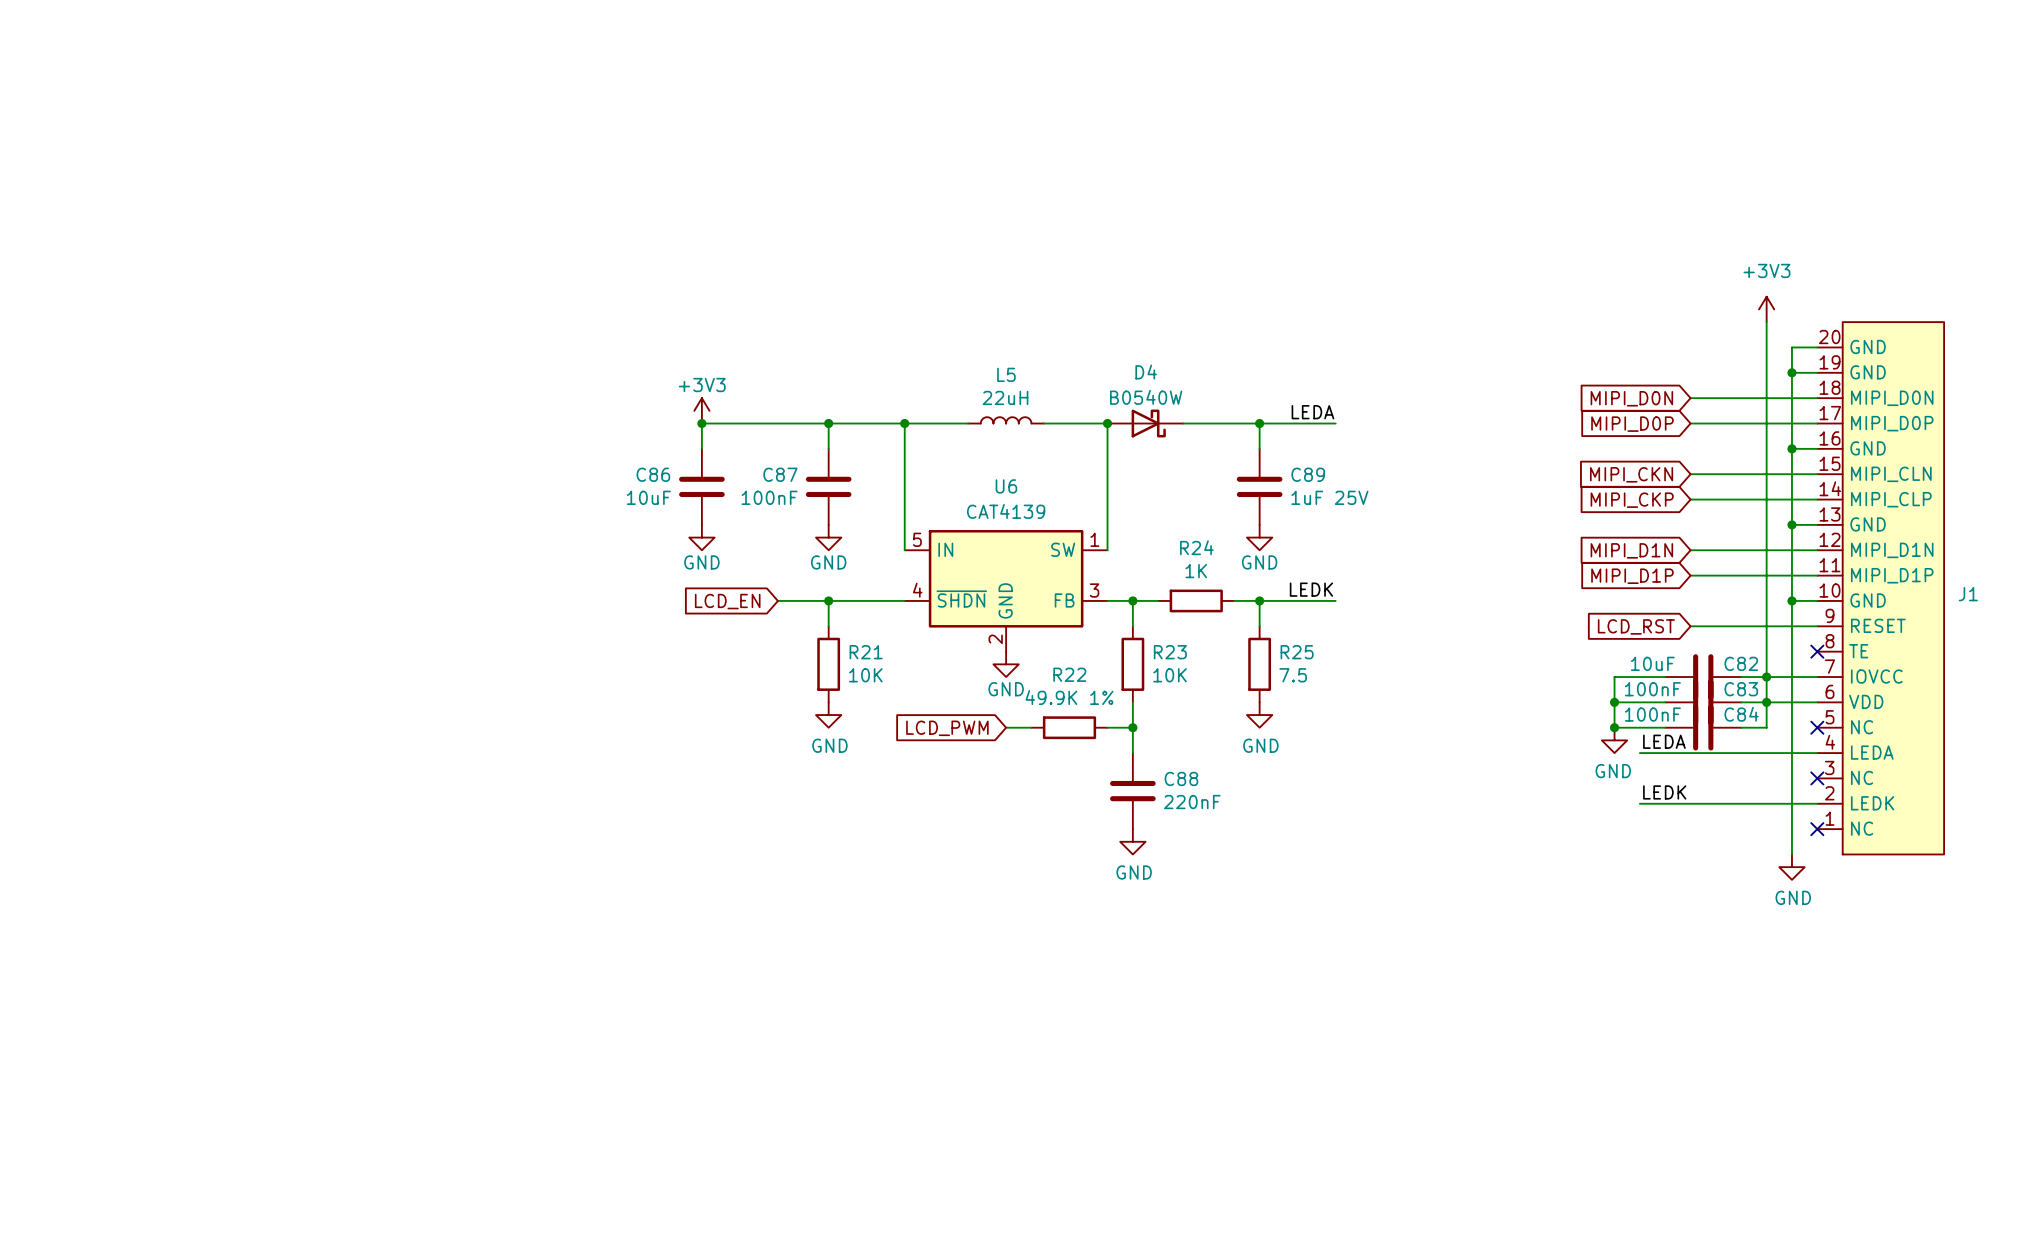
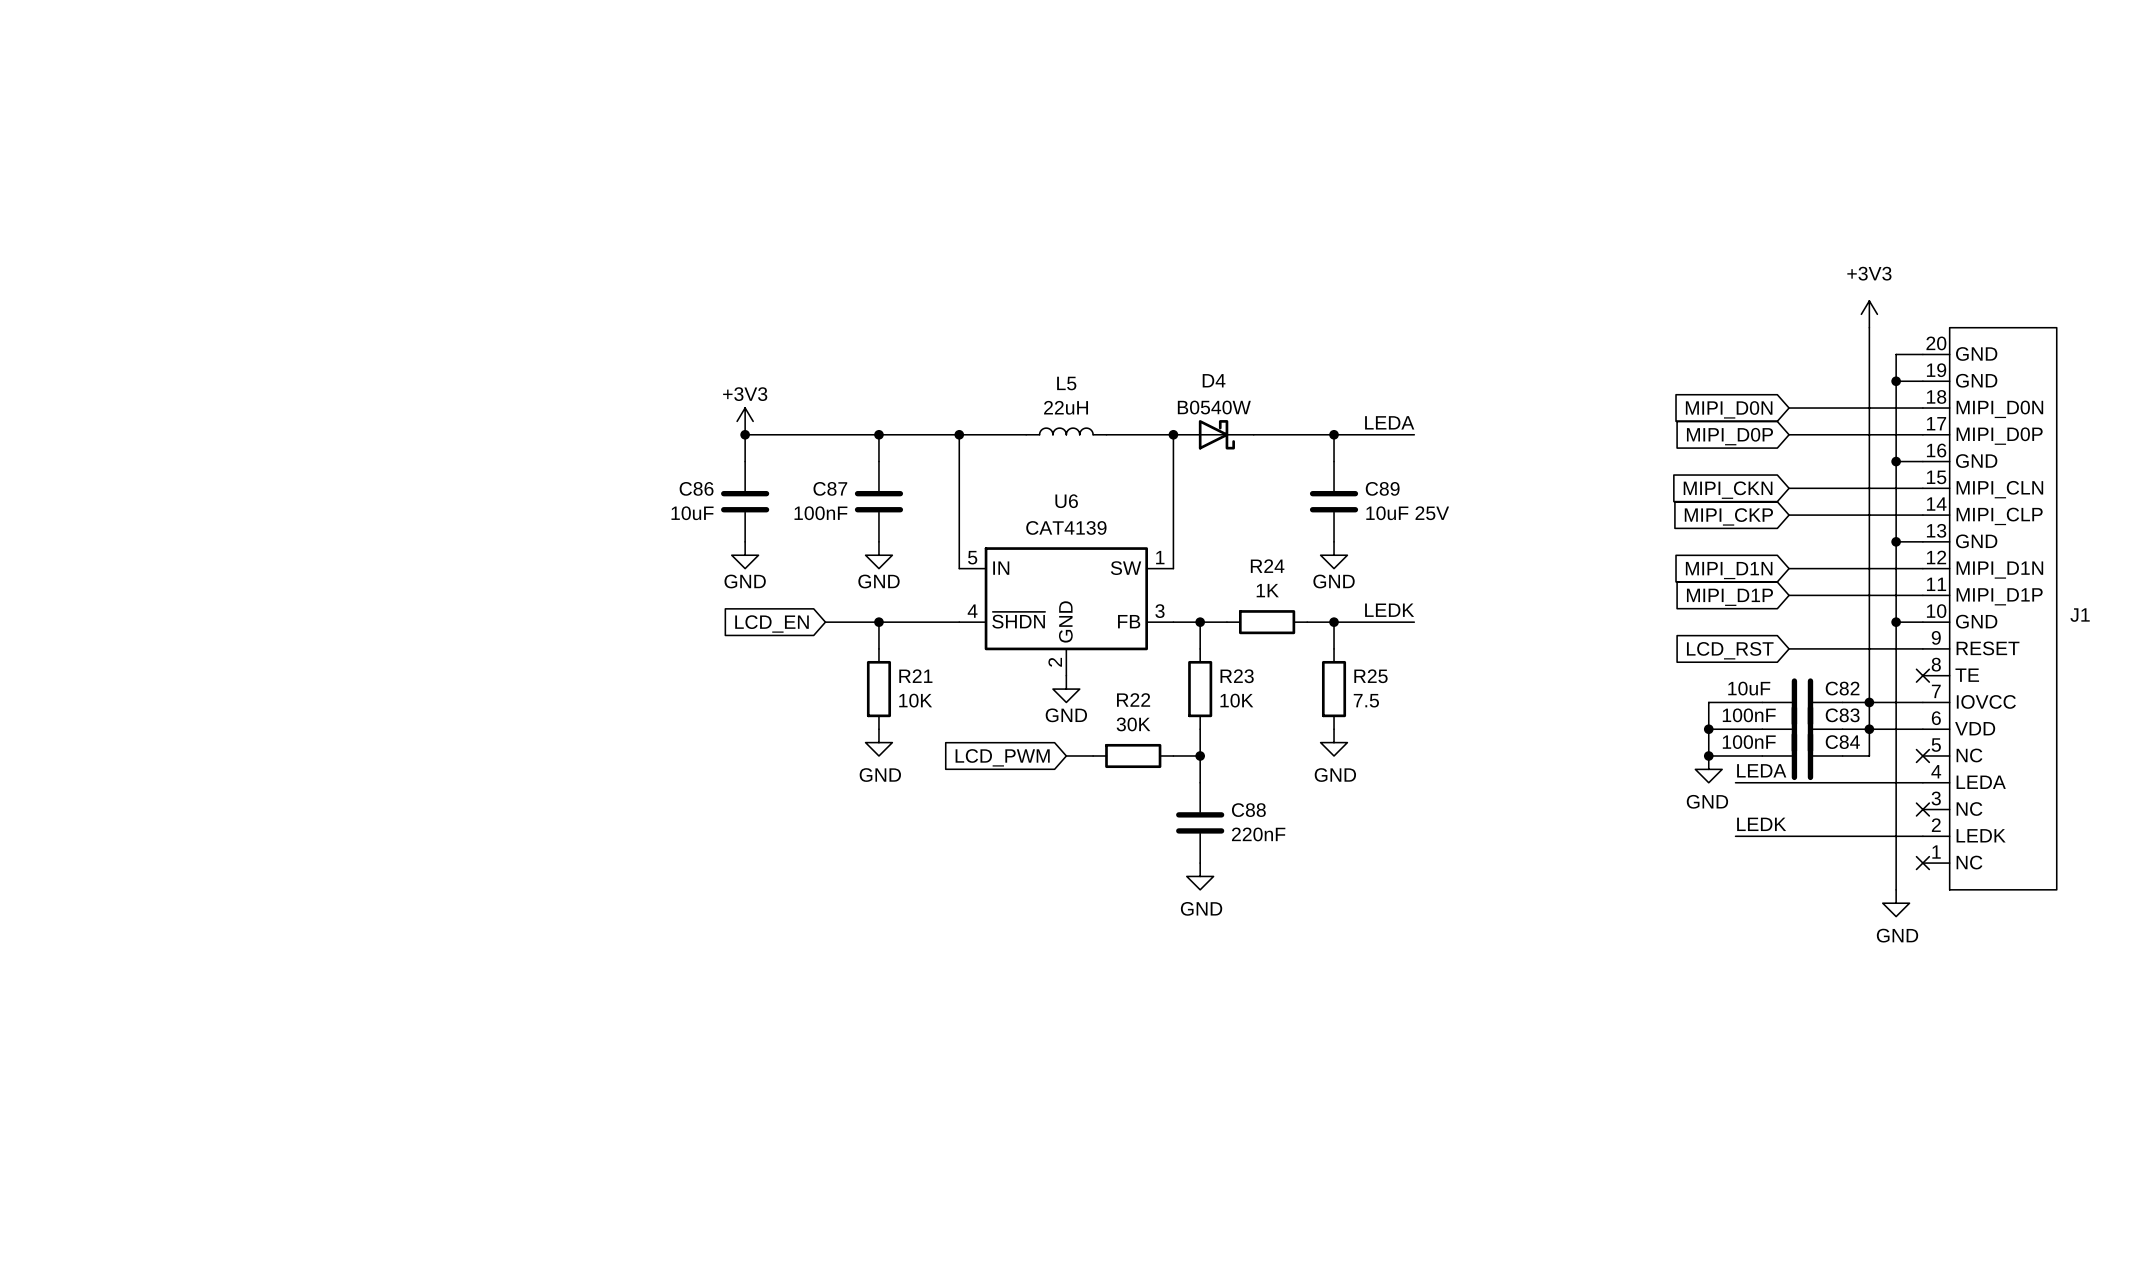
C89 value: 1uF 25V (1329, 497) -> 10uF 25V (1407, 513)
R22 value: 49.9K 1% (1069, 697) -> 30K (1133, 724)

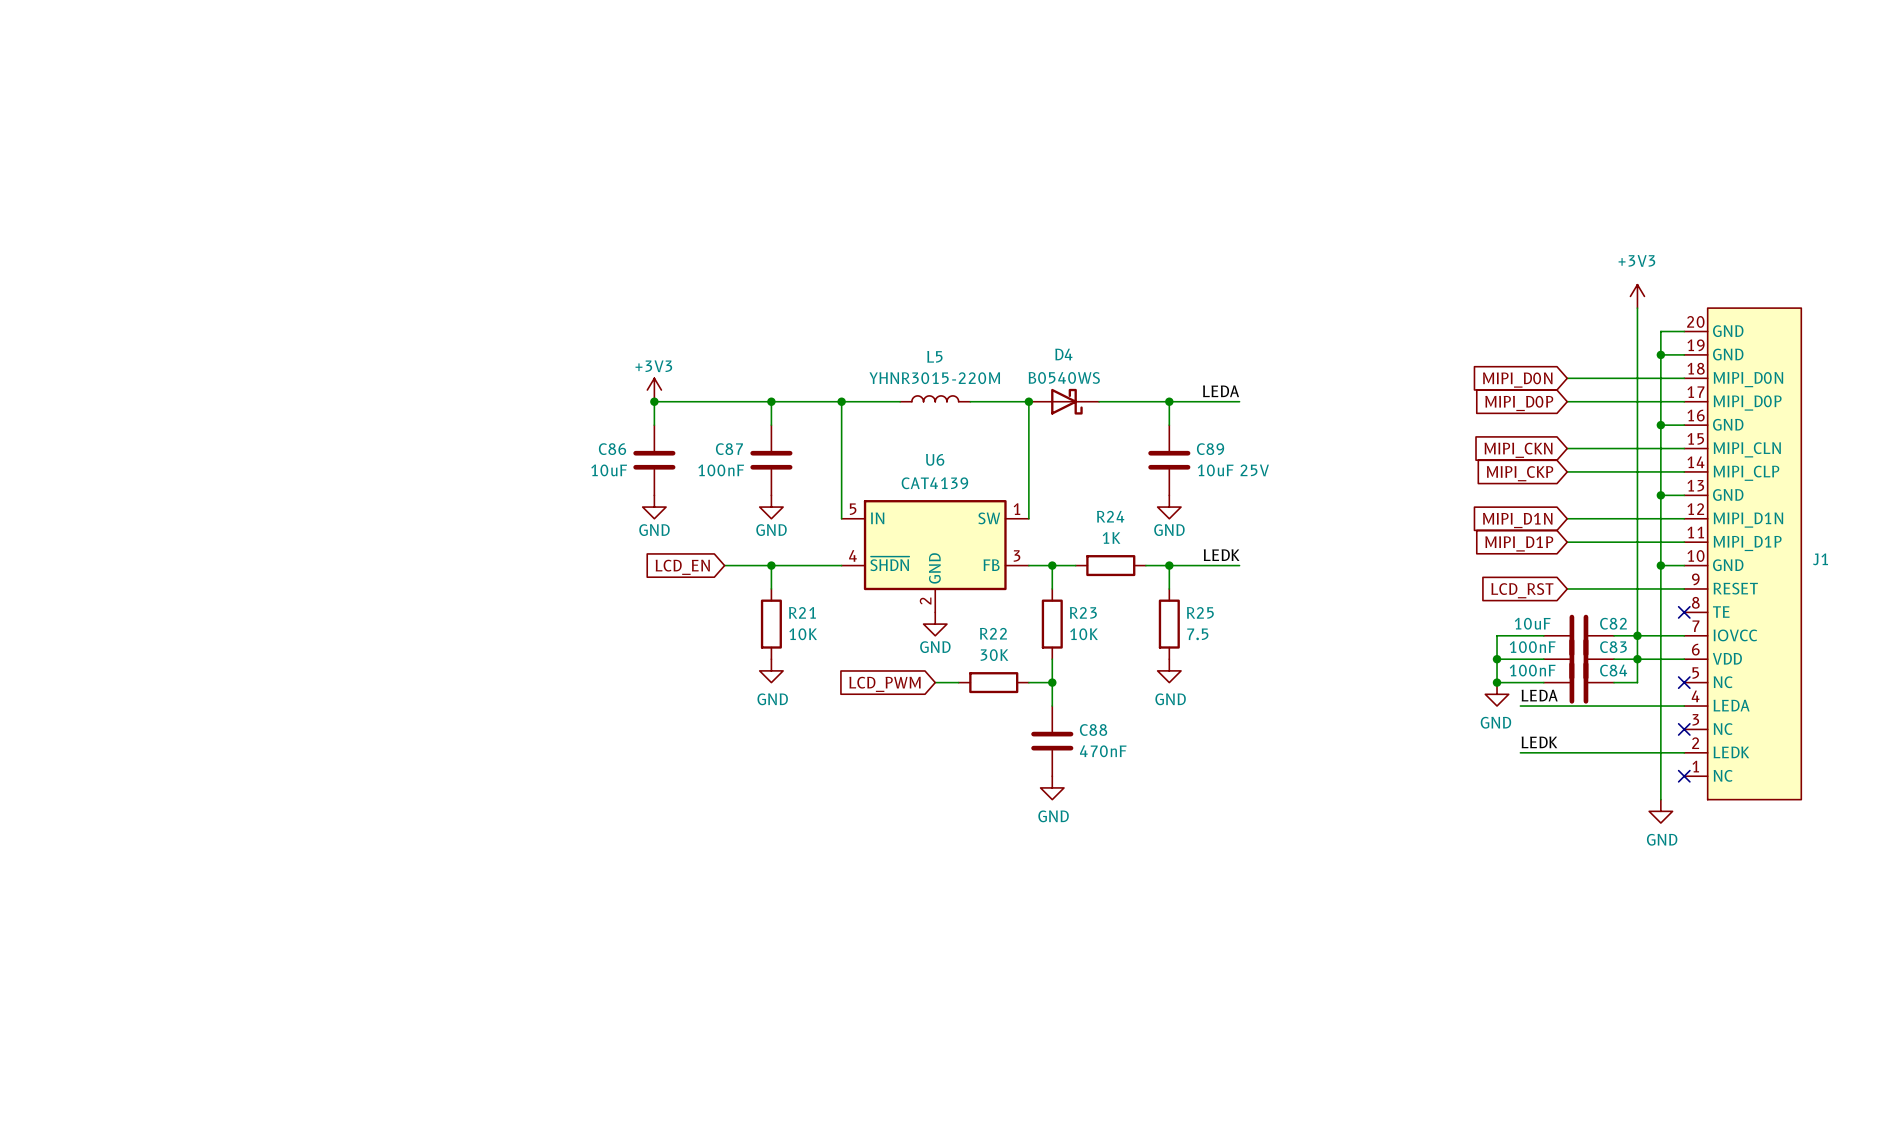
L5 value: 22uH (1066, 407) -> YHNR3015-220M (934, 378)
D4 value: B0540W (1214, 407) -> B0540WS (1064, 377)
C88 value: 220nF (1258, 834) -> 470nF (1103, 751)

